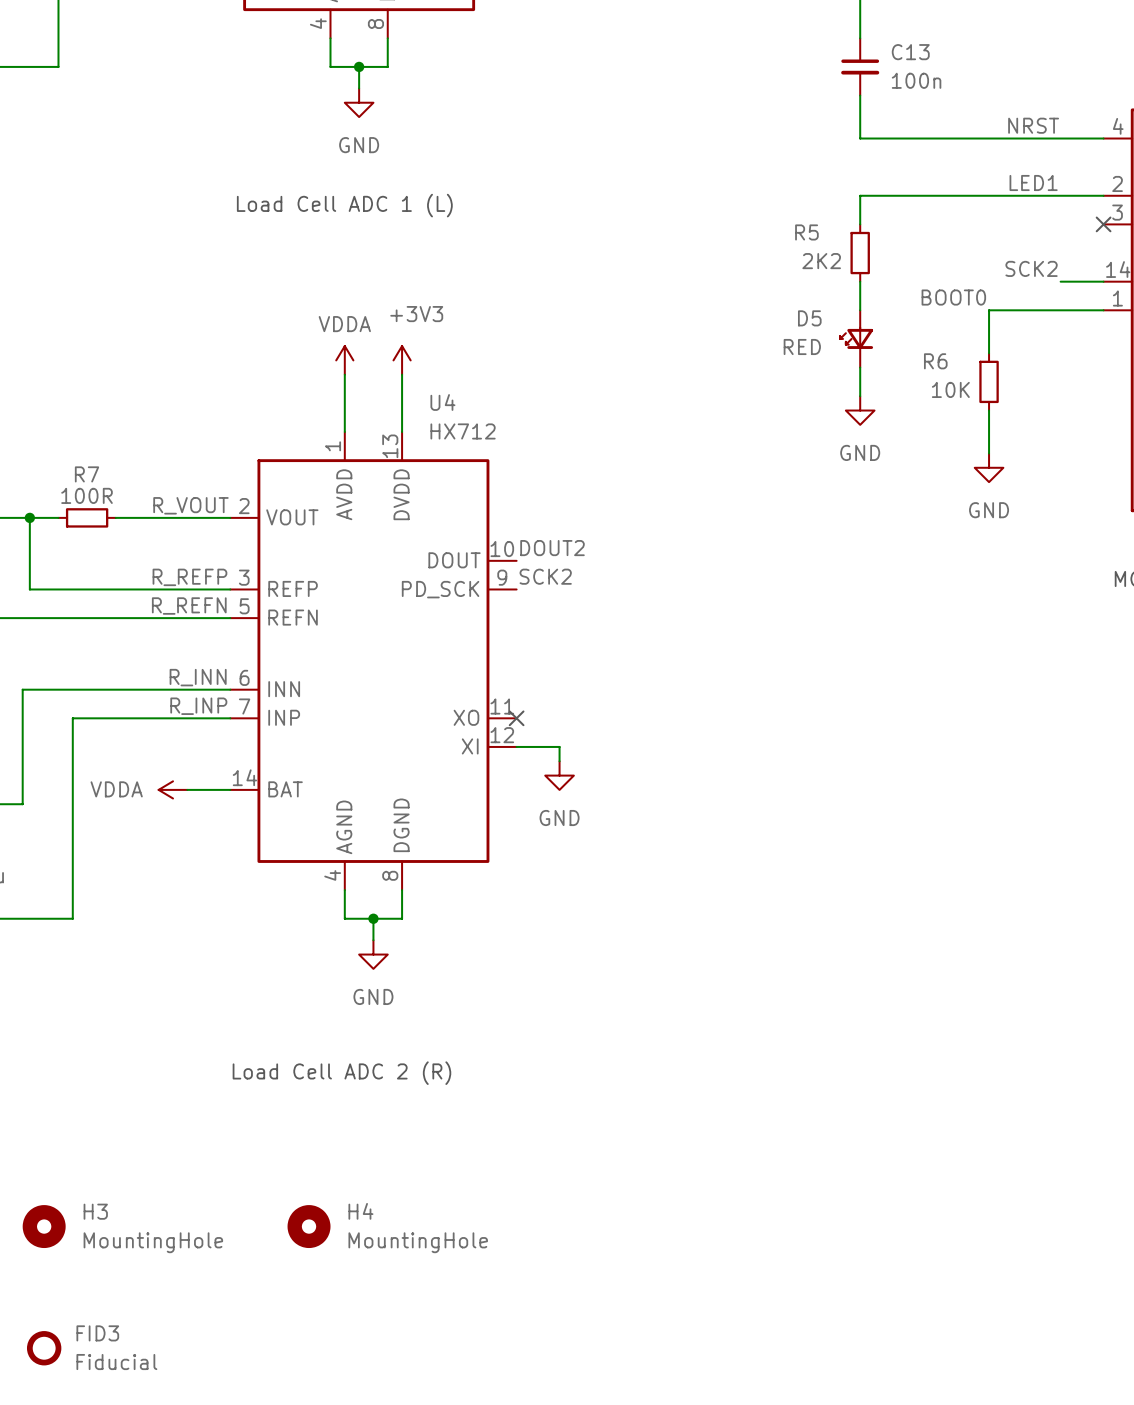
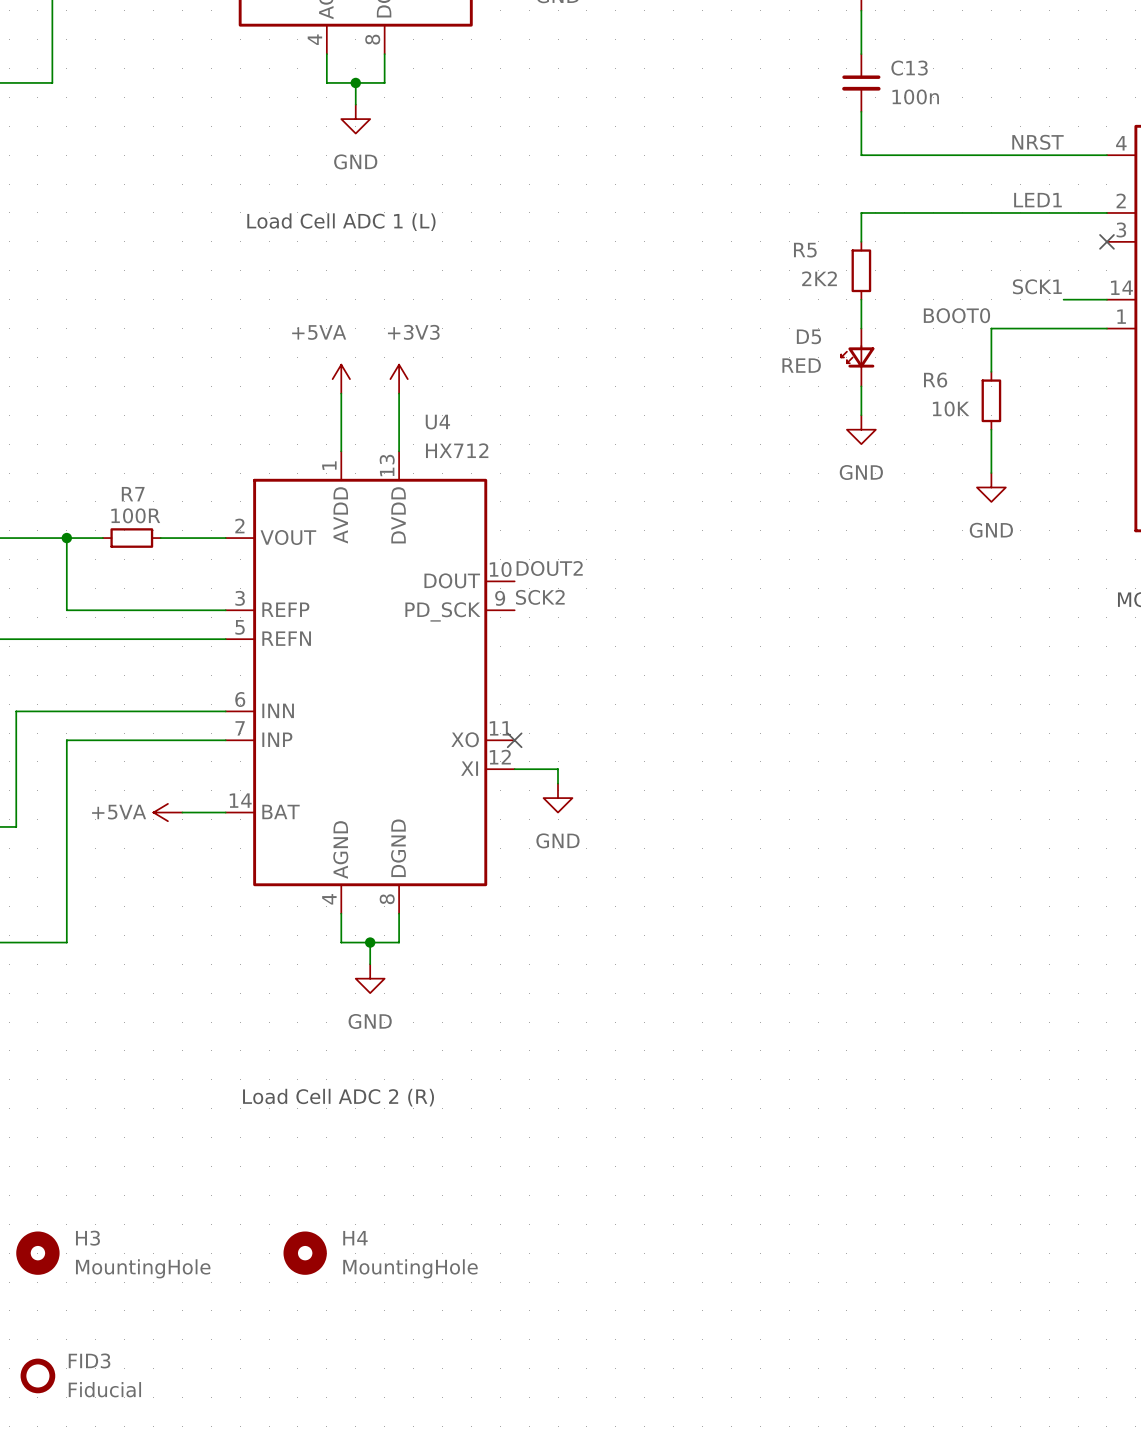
label: SCK2 (1031, 268) -> SCK1 (1037, 286)
power symbol: VDDA (344, 360) -> +5VA (341, 379)
label: R_VOUT (190, 505) -> none
wire: (29, 517) (29, 589) (72, 589) -> (66, 538) (66, 610)
junction position: (29, 517) -> (66, 538)
R7 position: (87, 517) -> (131, 538)
wire: (115, 517) (165, 517) -> (52, 538) (102, 538)
label: R_REFP (189, 577) -> none
label: R_REFN (189, 606) -> none
label: R_INN (198, 677) -> none
label: R_INP (198, 706) -> none
power symbol: VDDA (173, 789) -> +5VA (167, 812)

